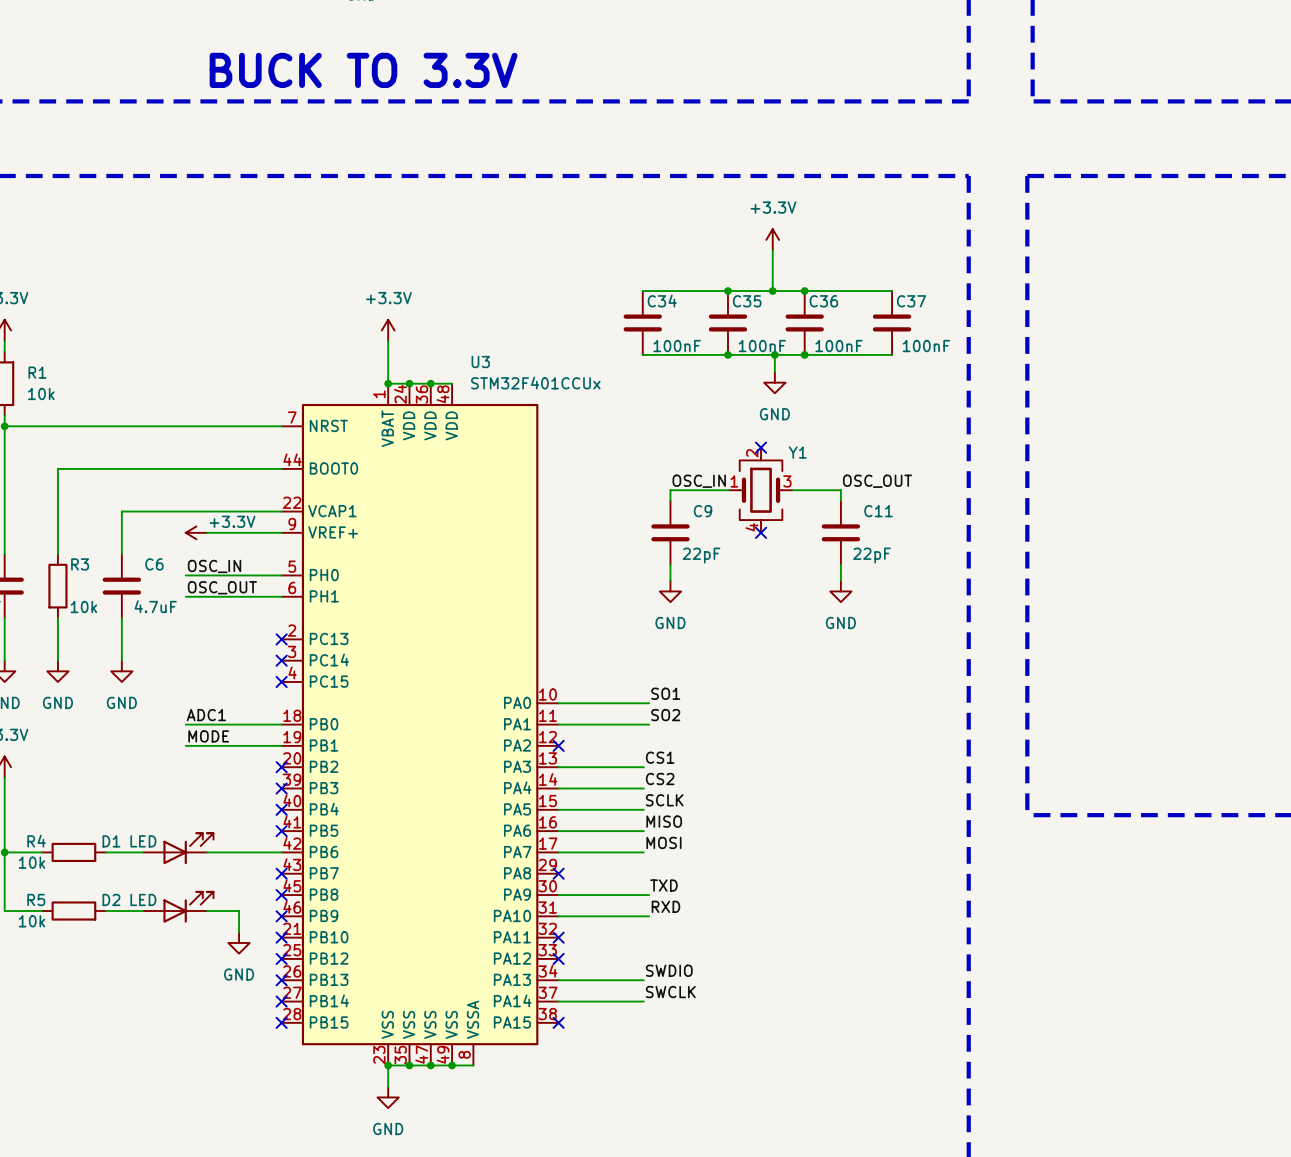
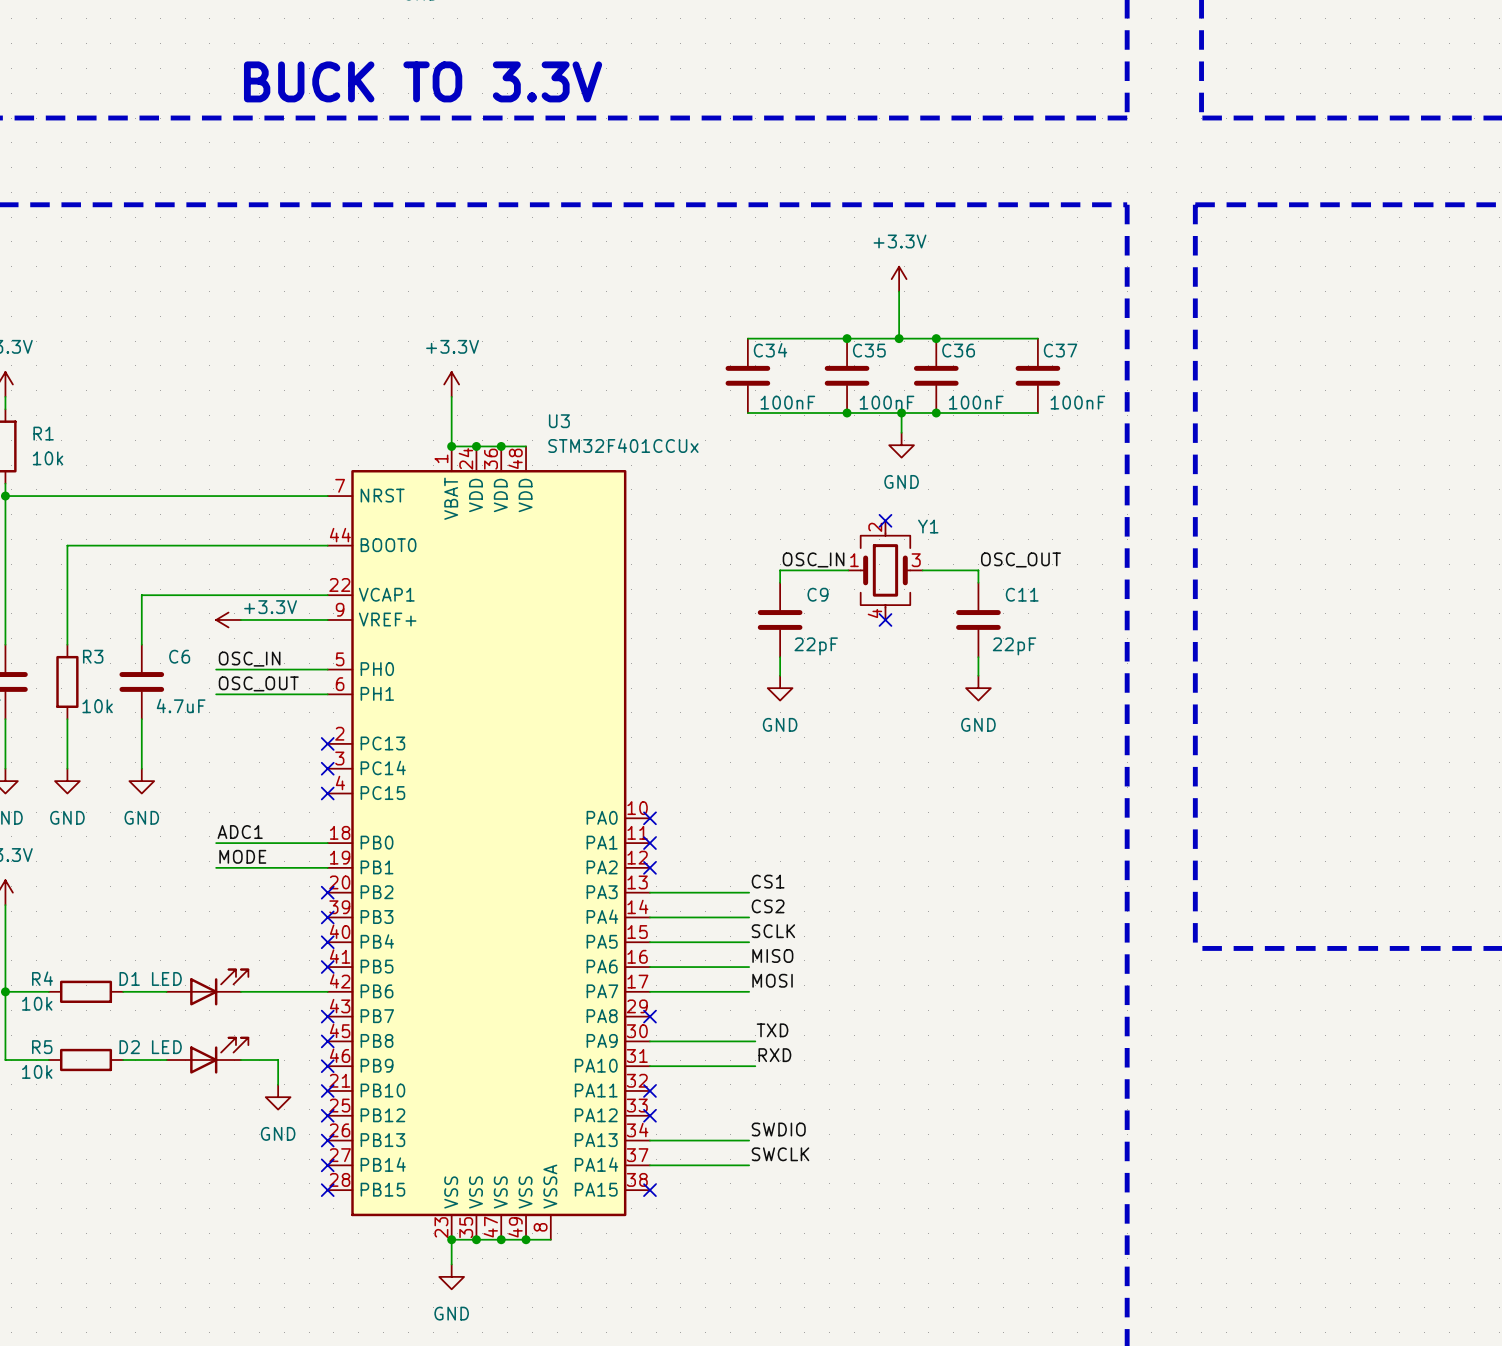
label: SO1 (665, 693) -> none
wire: (558, 703) (649, 703) -> none
no-connect mark: none -> (649, 818)
label: SO2 (665, 715) -> none
wire: (558, 724) (649, 724) -> none
no-connect mark: none -> (649, 843)

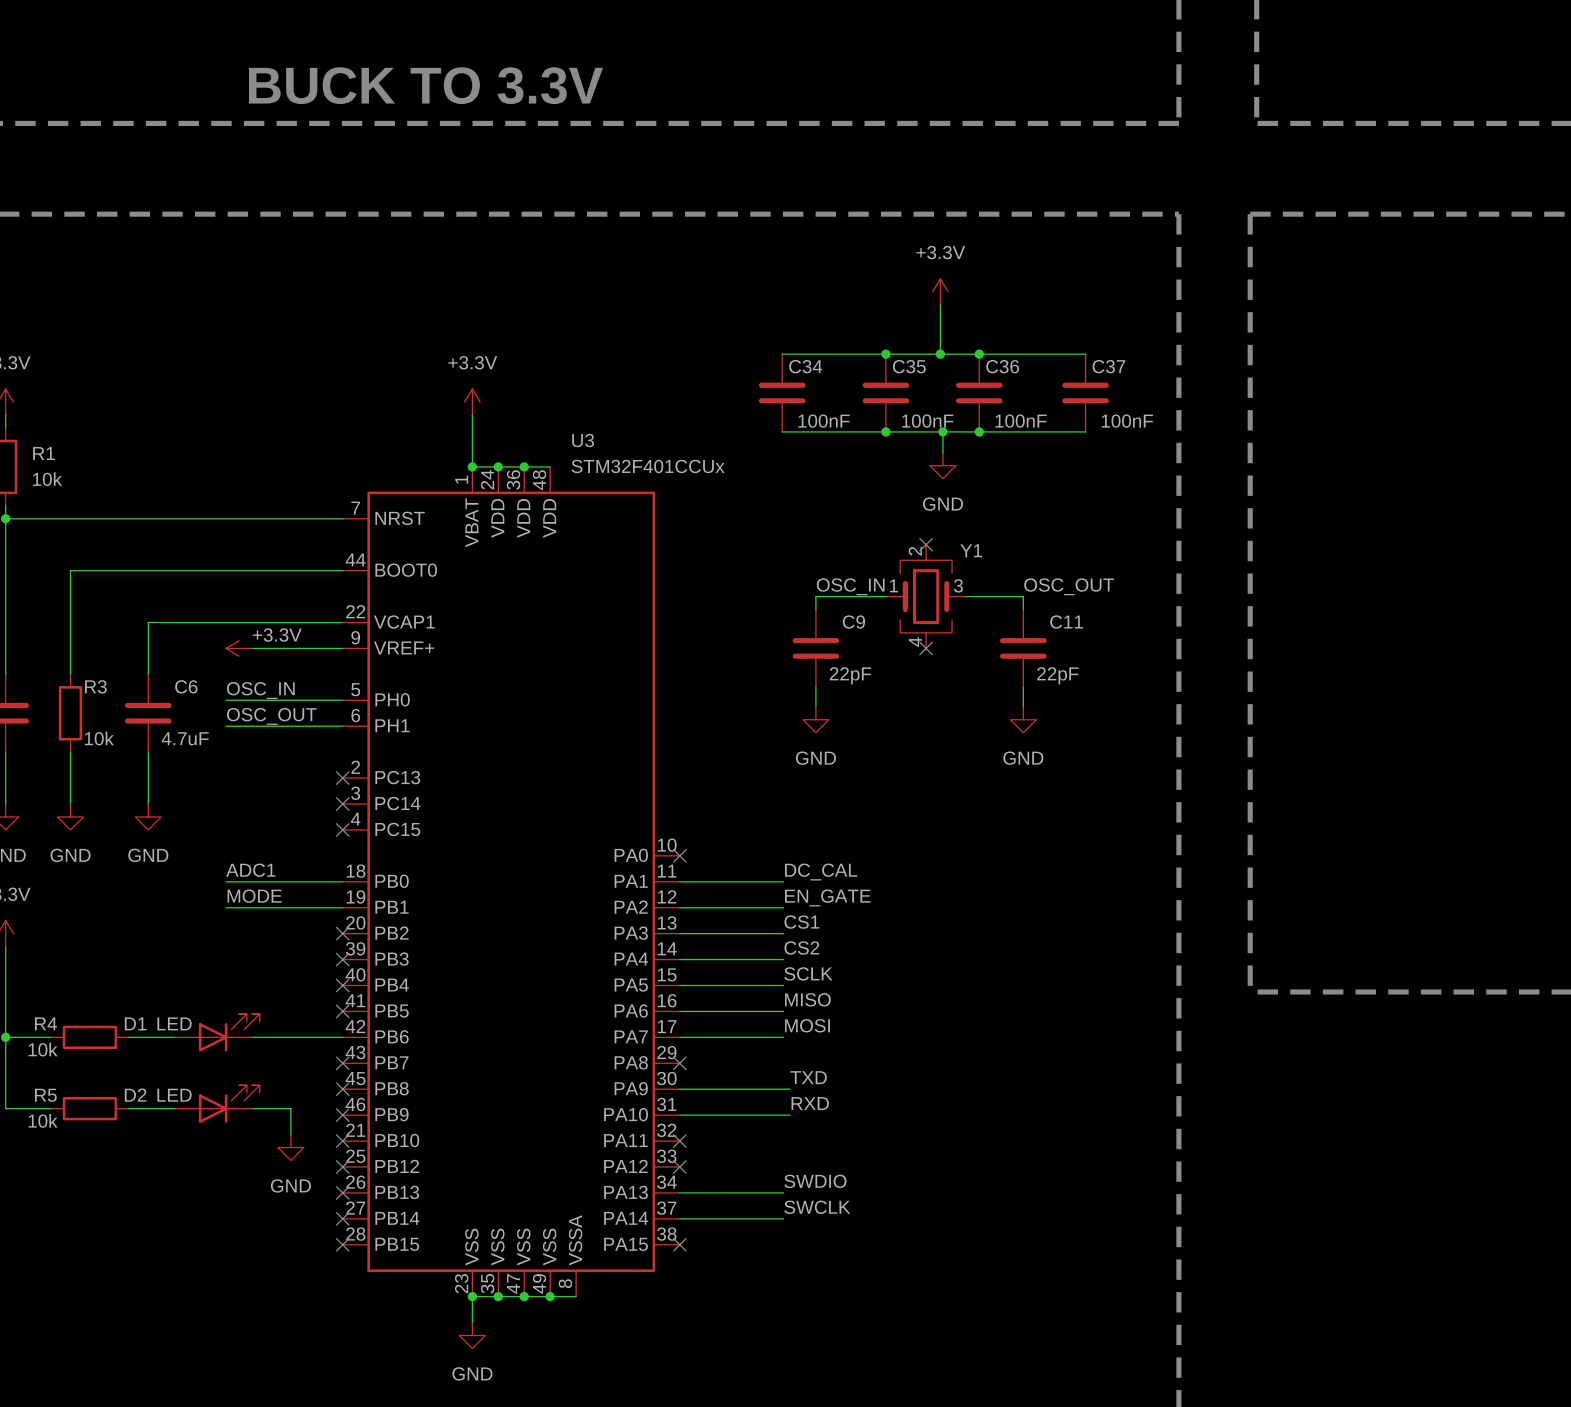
label: none -> DC_CAL (821, 872)
wire: none -> (679, 881) (783, 881)
no-connect mark: (649, 843) -> none
label: none -> EN_GATE (827, 897)
wire: none -> (679, 907) (783, 907)
no-connect mark: (649, 867) -> none

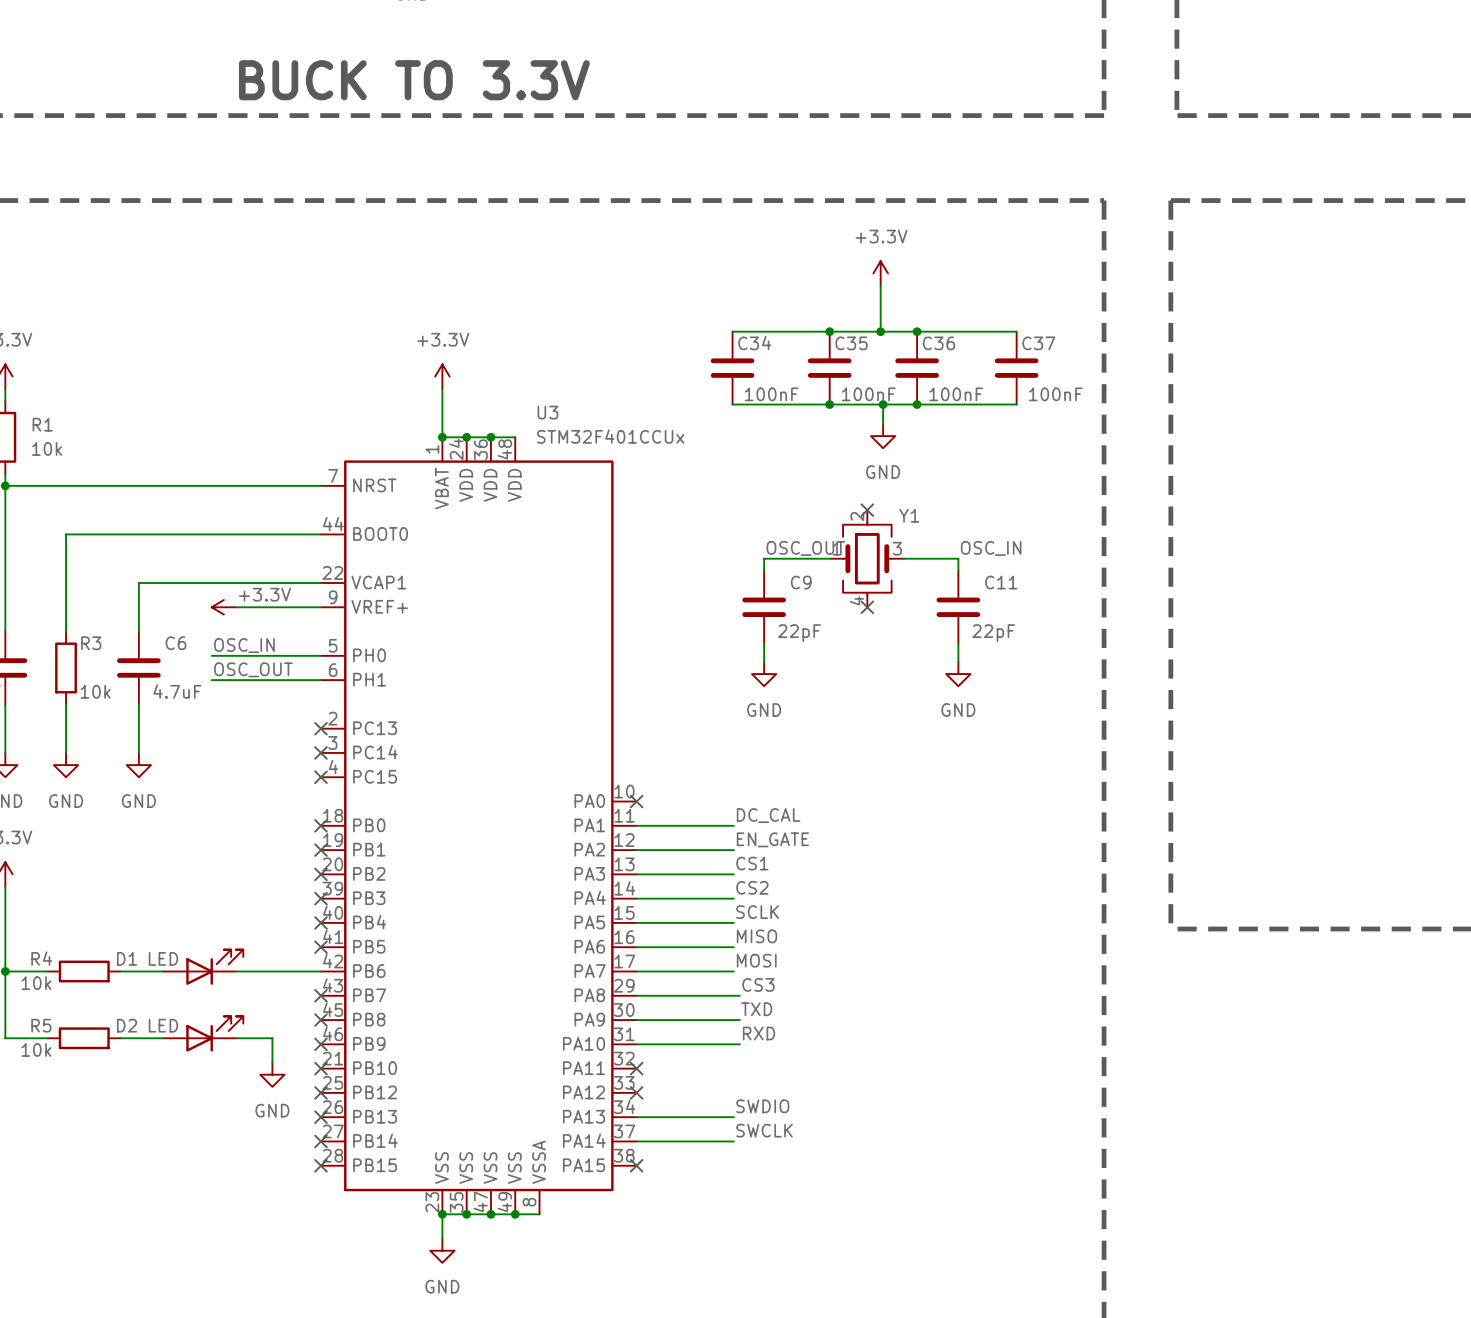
label: OSC_IN (850, 586) -> OSC_OUT (805, 548)
label: OSC_OUT (1069, 586) -> OSC_IN (991, 548)
label: ADC1 (250, 870) -> none
wire: (226, 881) (342, 881) -> none
no-connect mark: none -> (320, 825)
label: MODE (254, 896) -> none
wire: (226, 907) (342, 907) -> none
no-connect mark: none -> (320, 850)
label: none -> CS3 (758, 984)
wire: none -> (636, 995) (739, 995)
no-connect mark: (679, 1063) -> none

